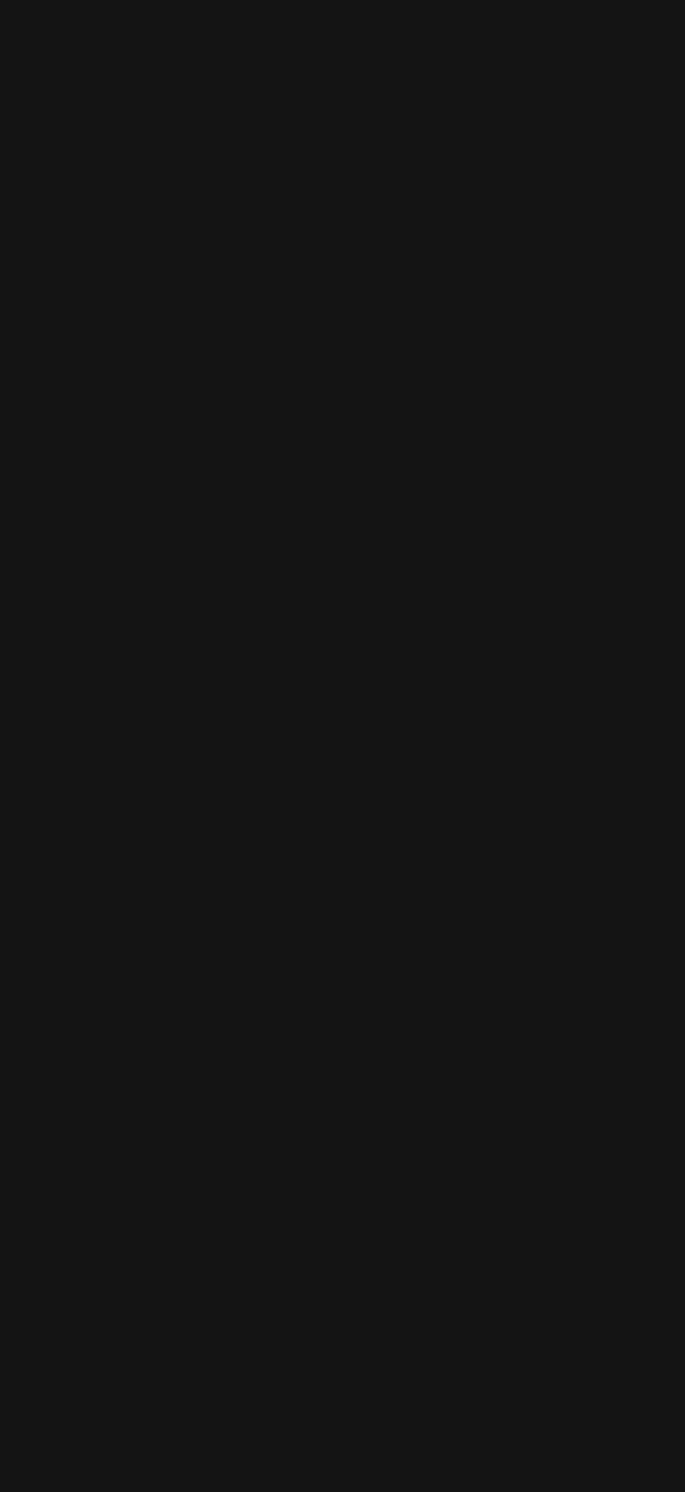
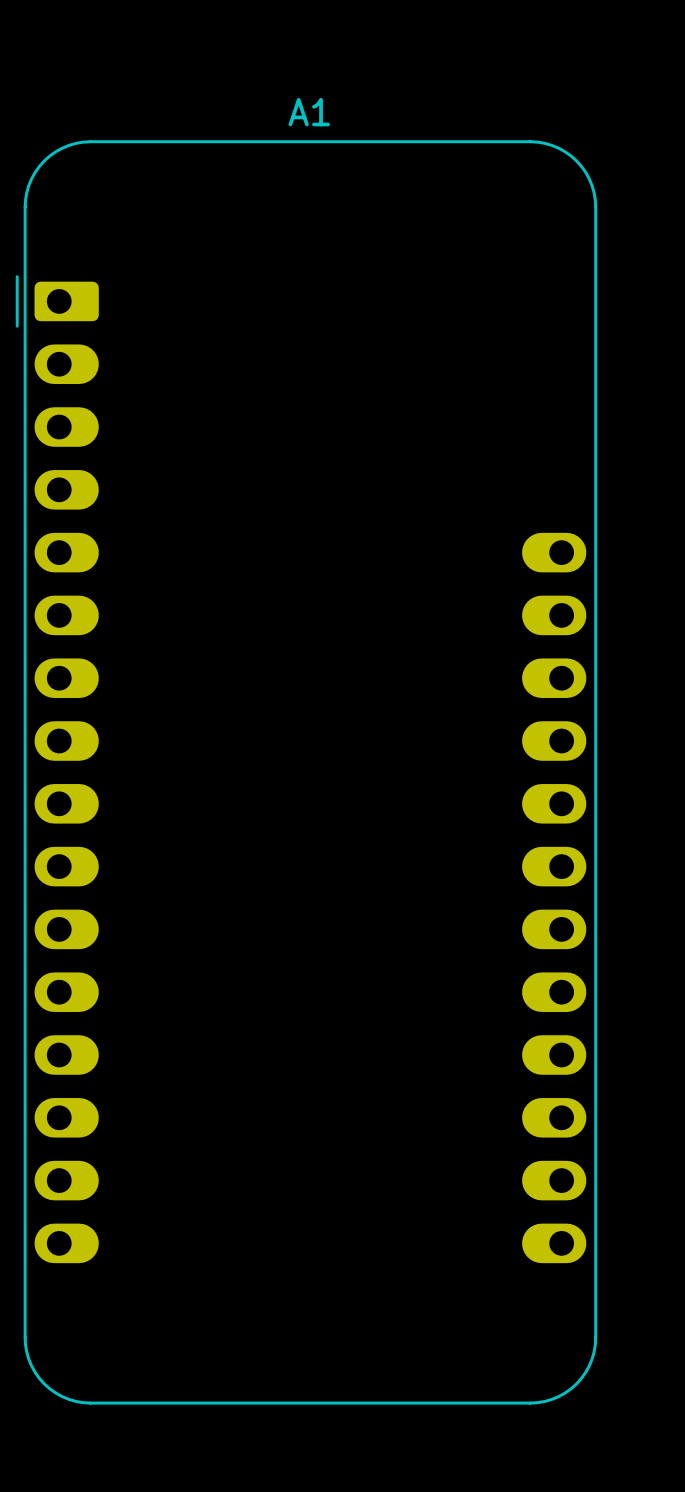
A1: none -> (306, 772)

